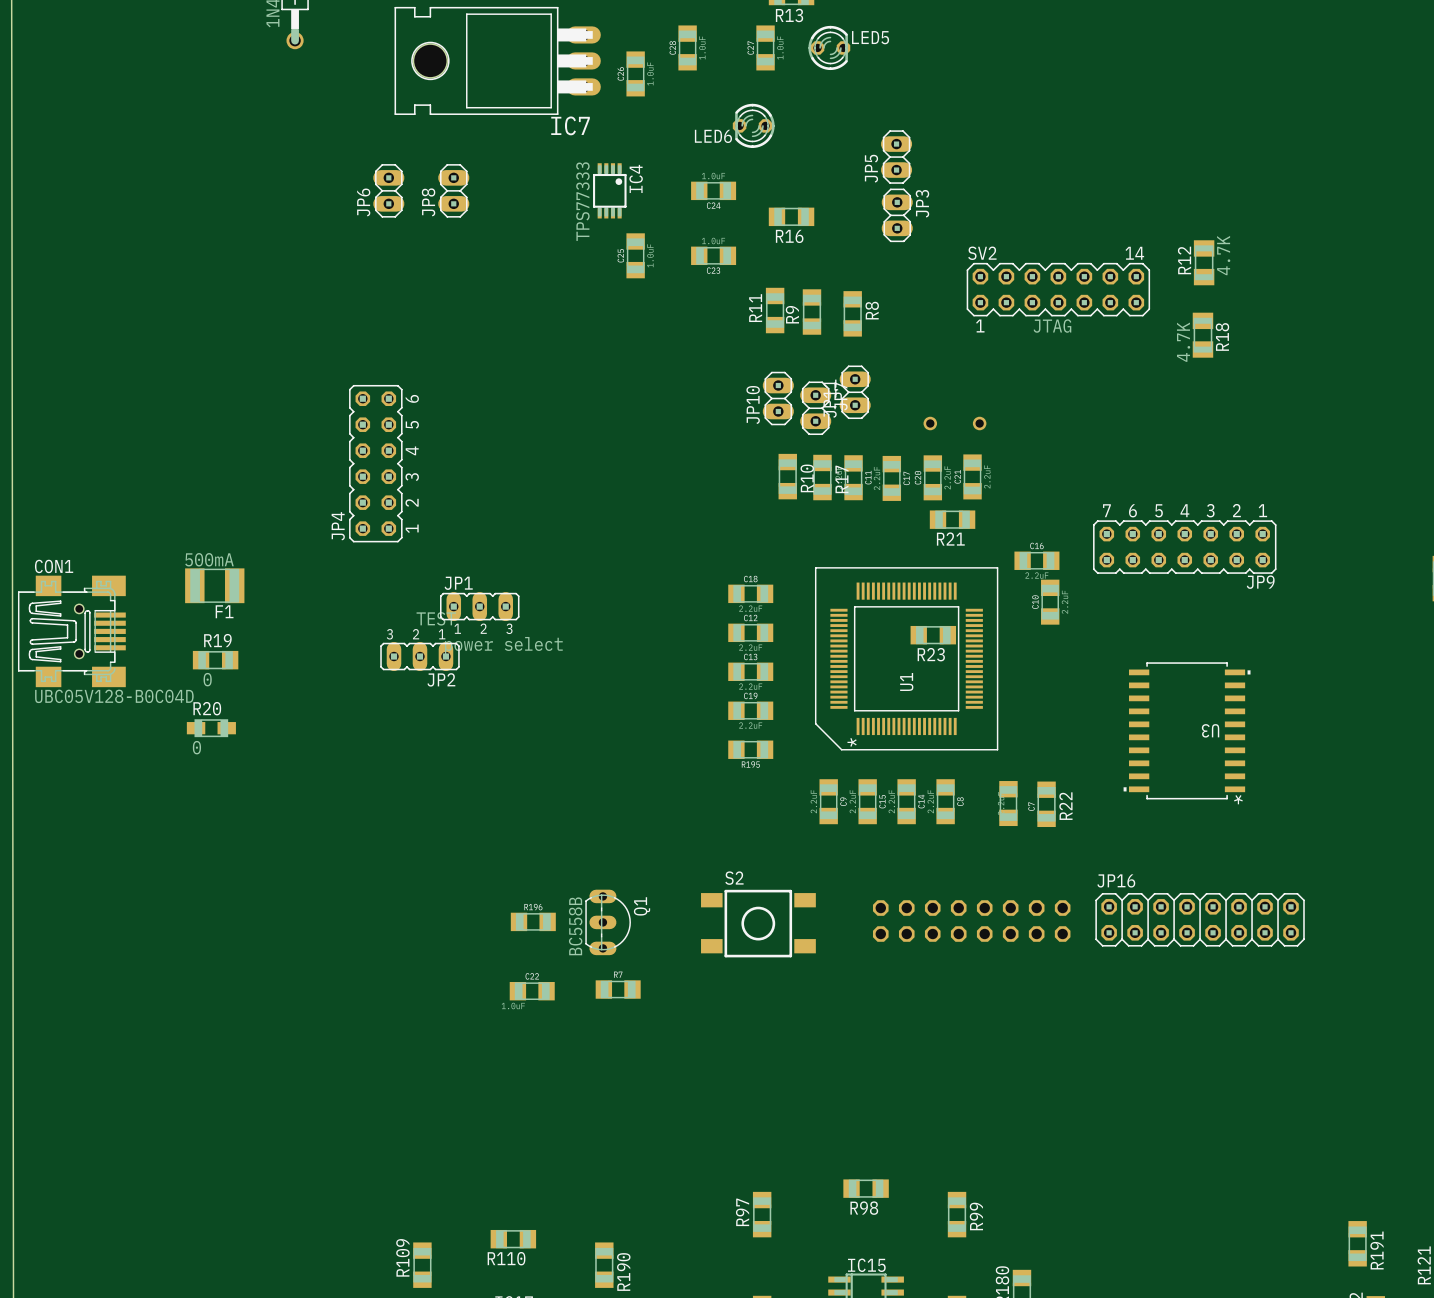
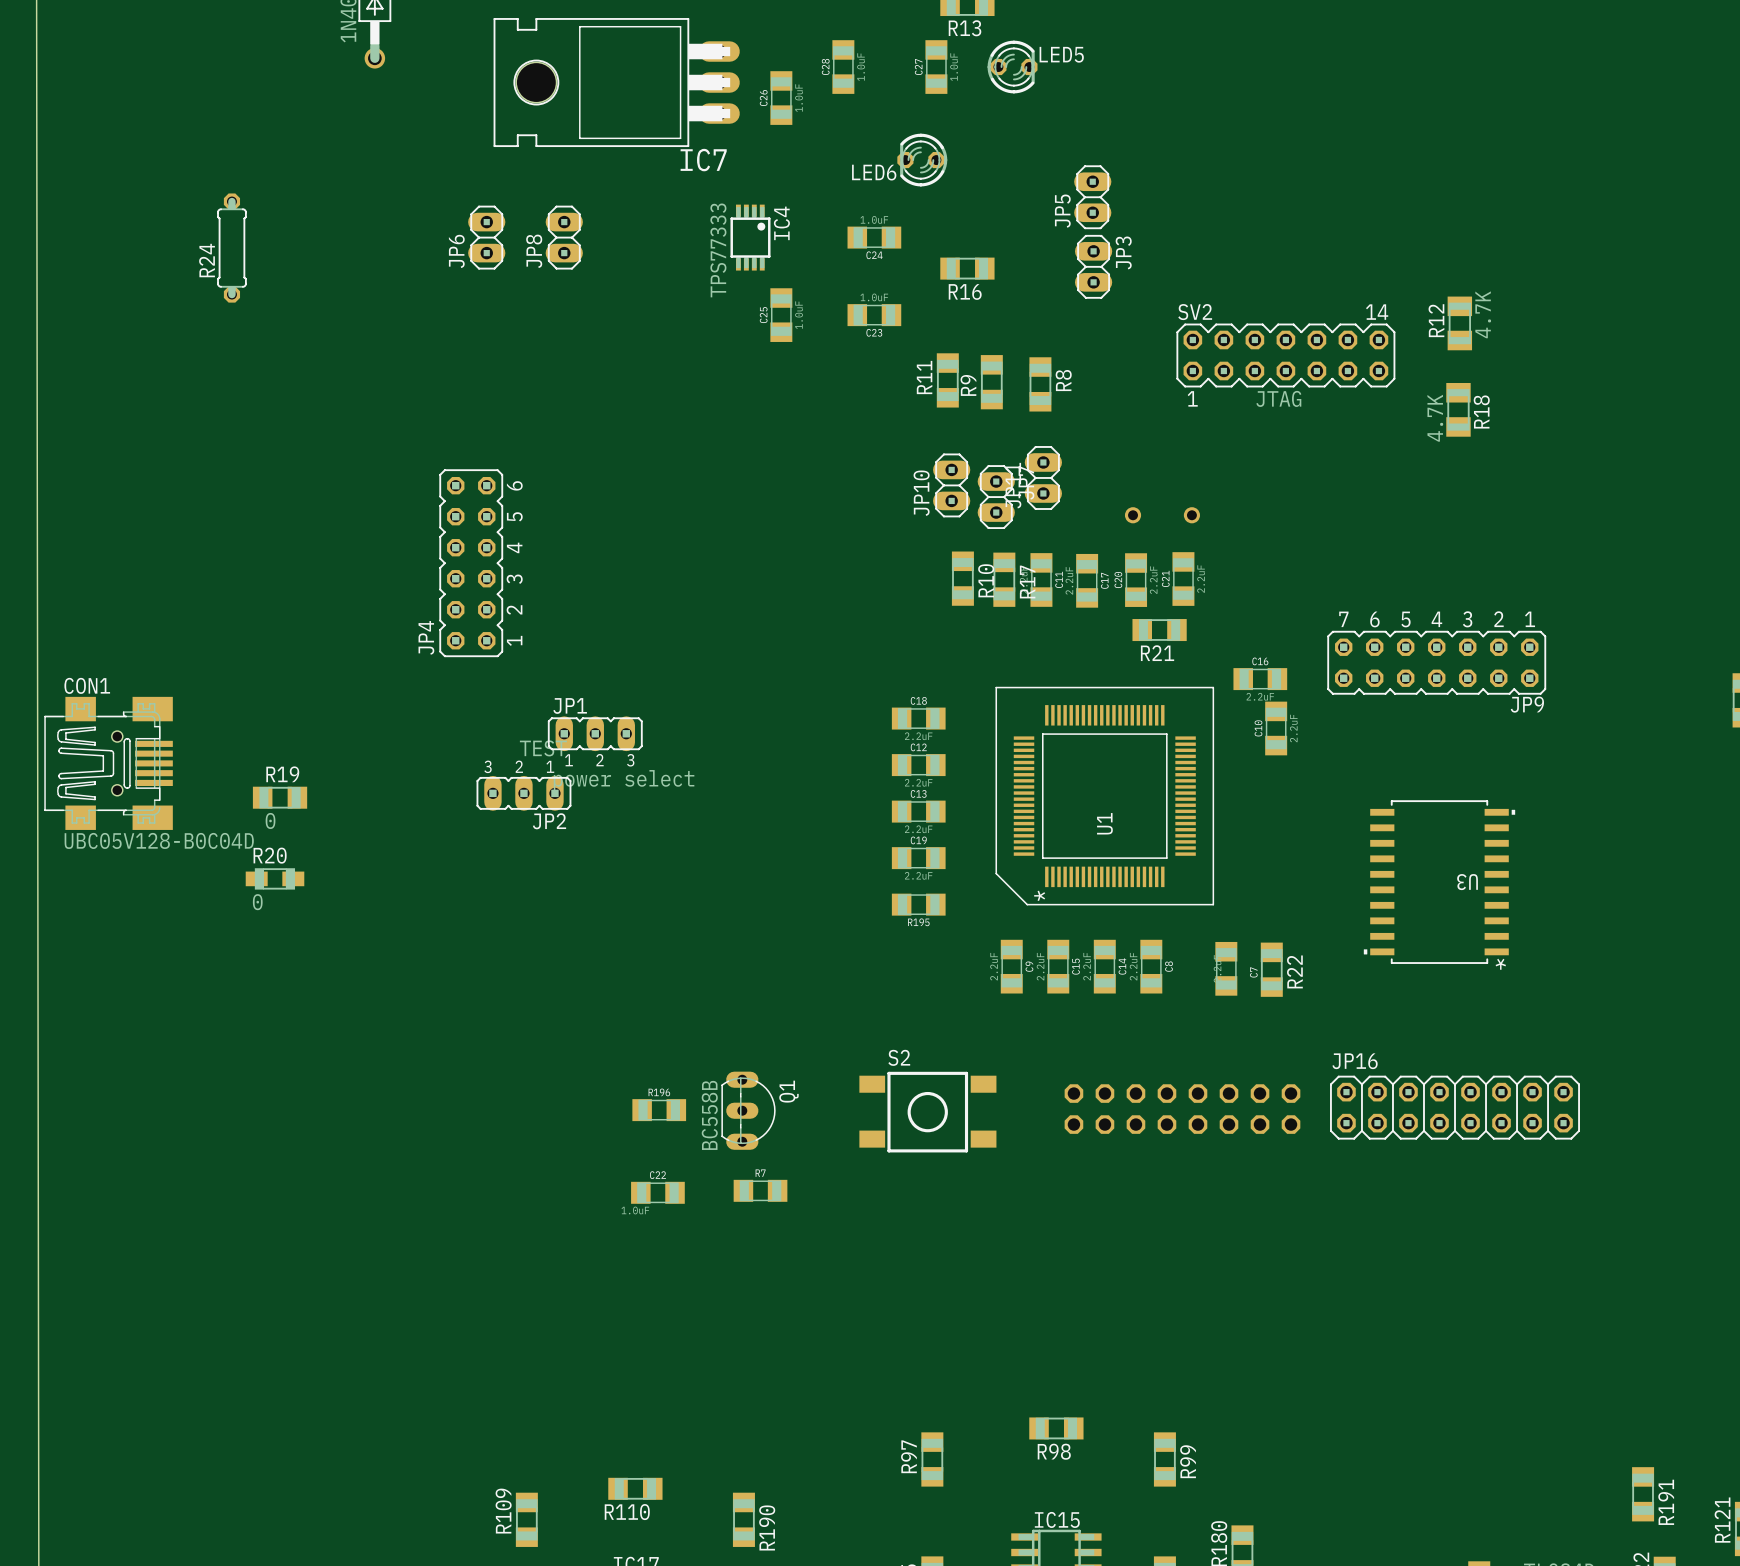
R24: none -> (231, 248)
F1: 500mA (214, 585) -> none
R23: (933, 635) -> none

